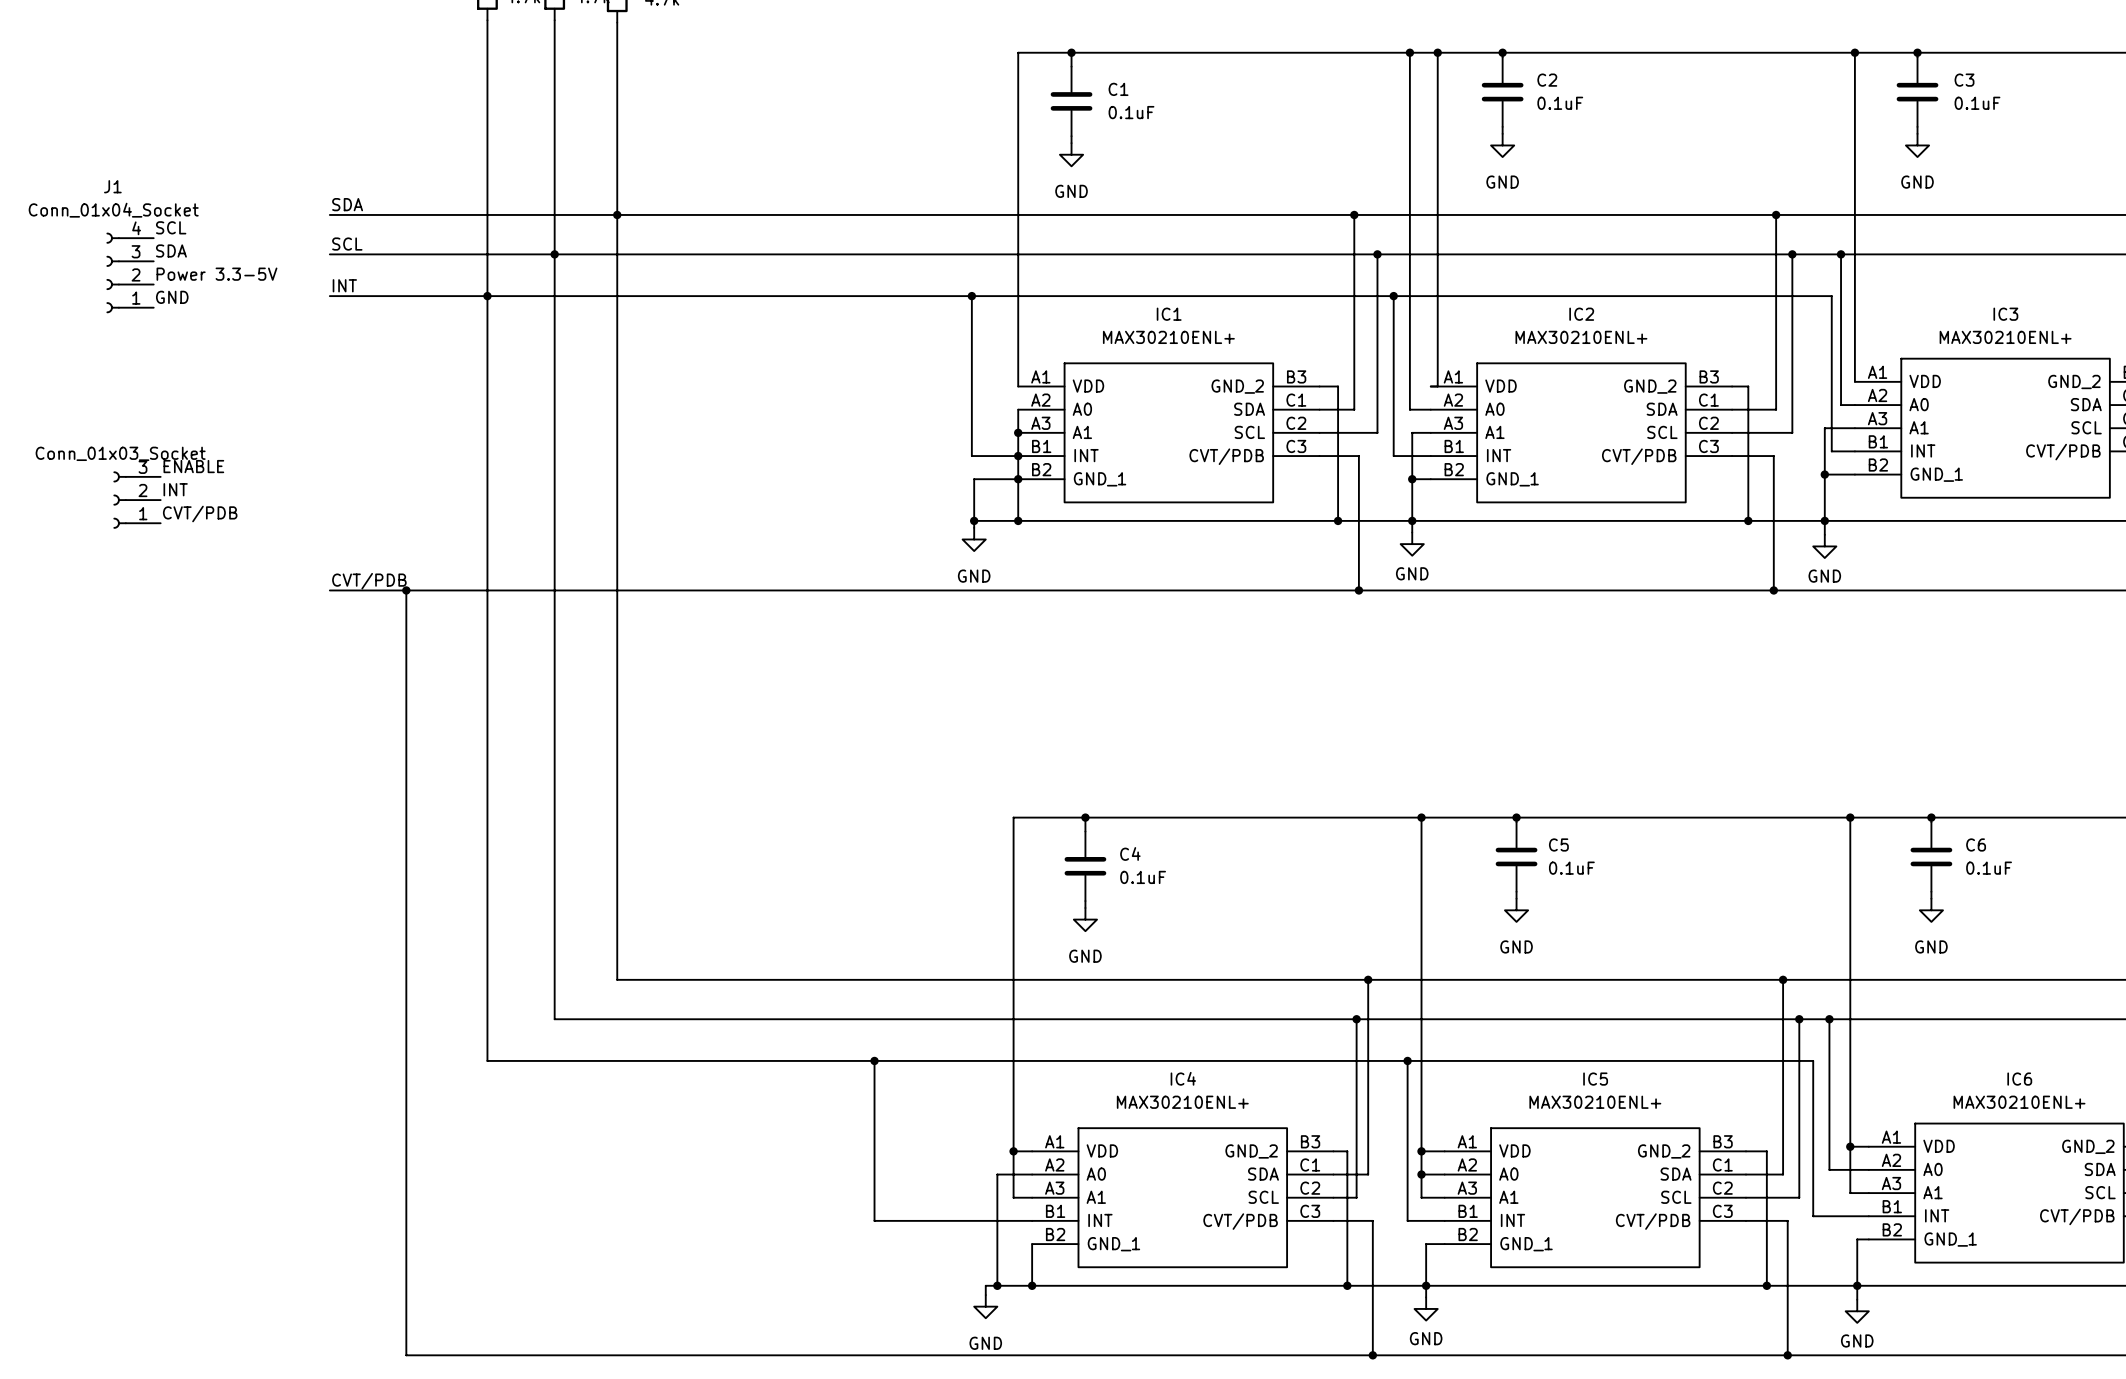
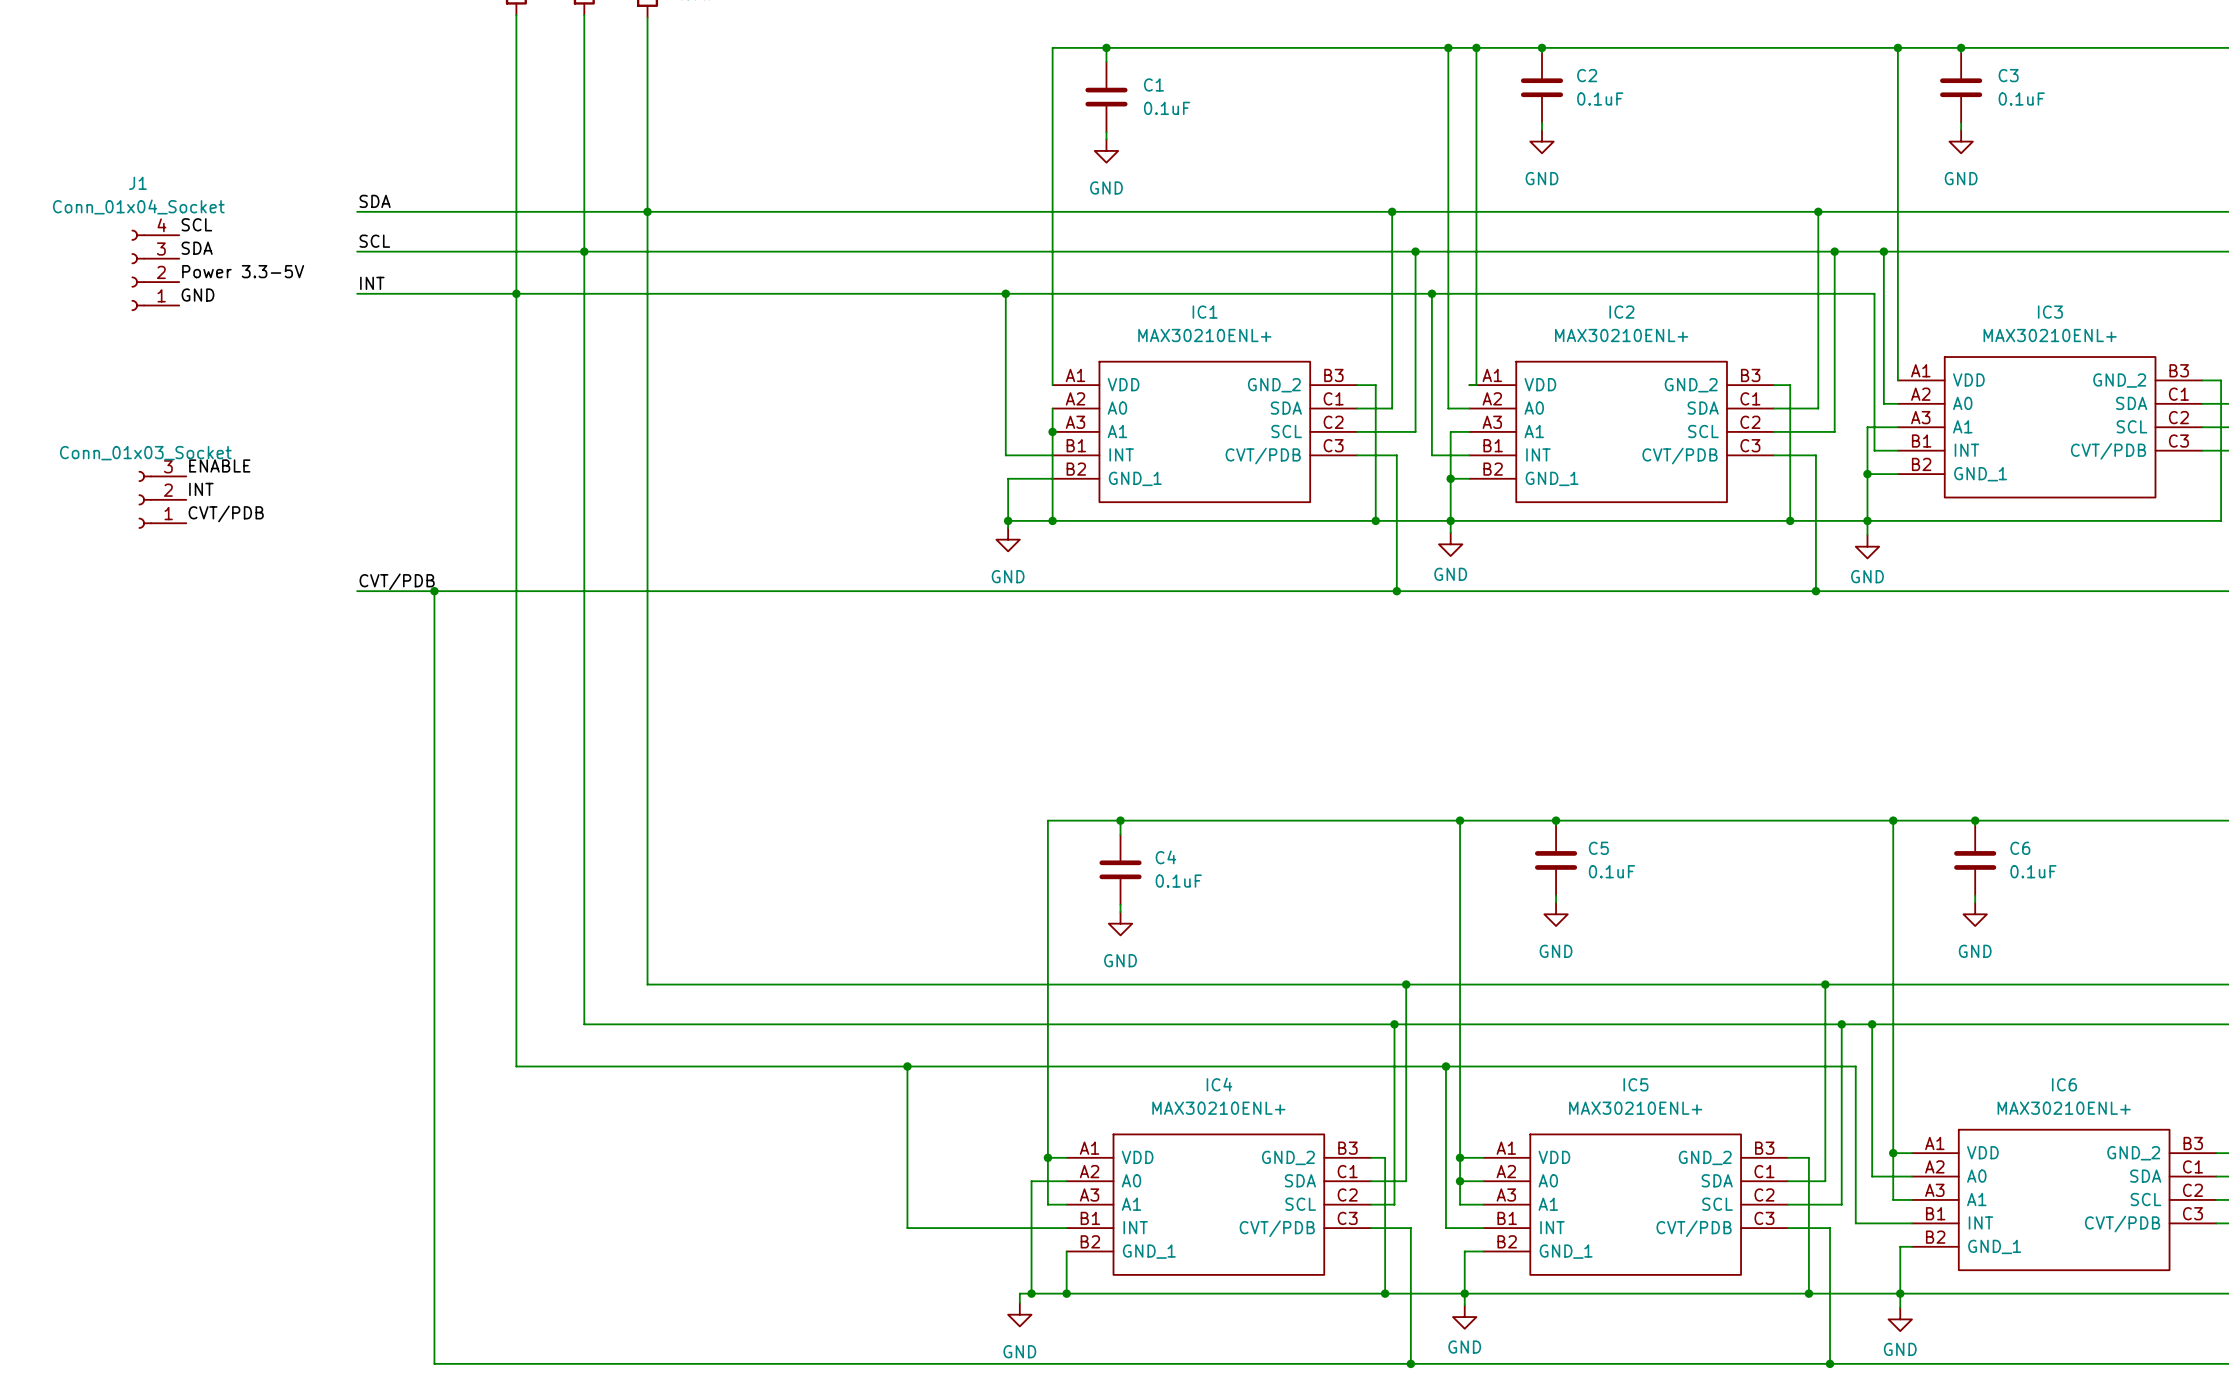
junction: (1018, 456) -> none
junction: (1018, 479) -> none

